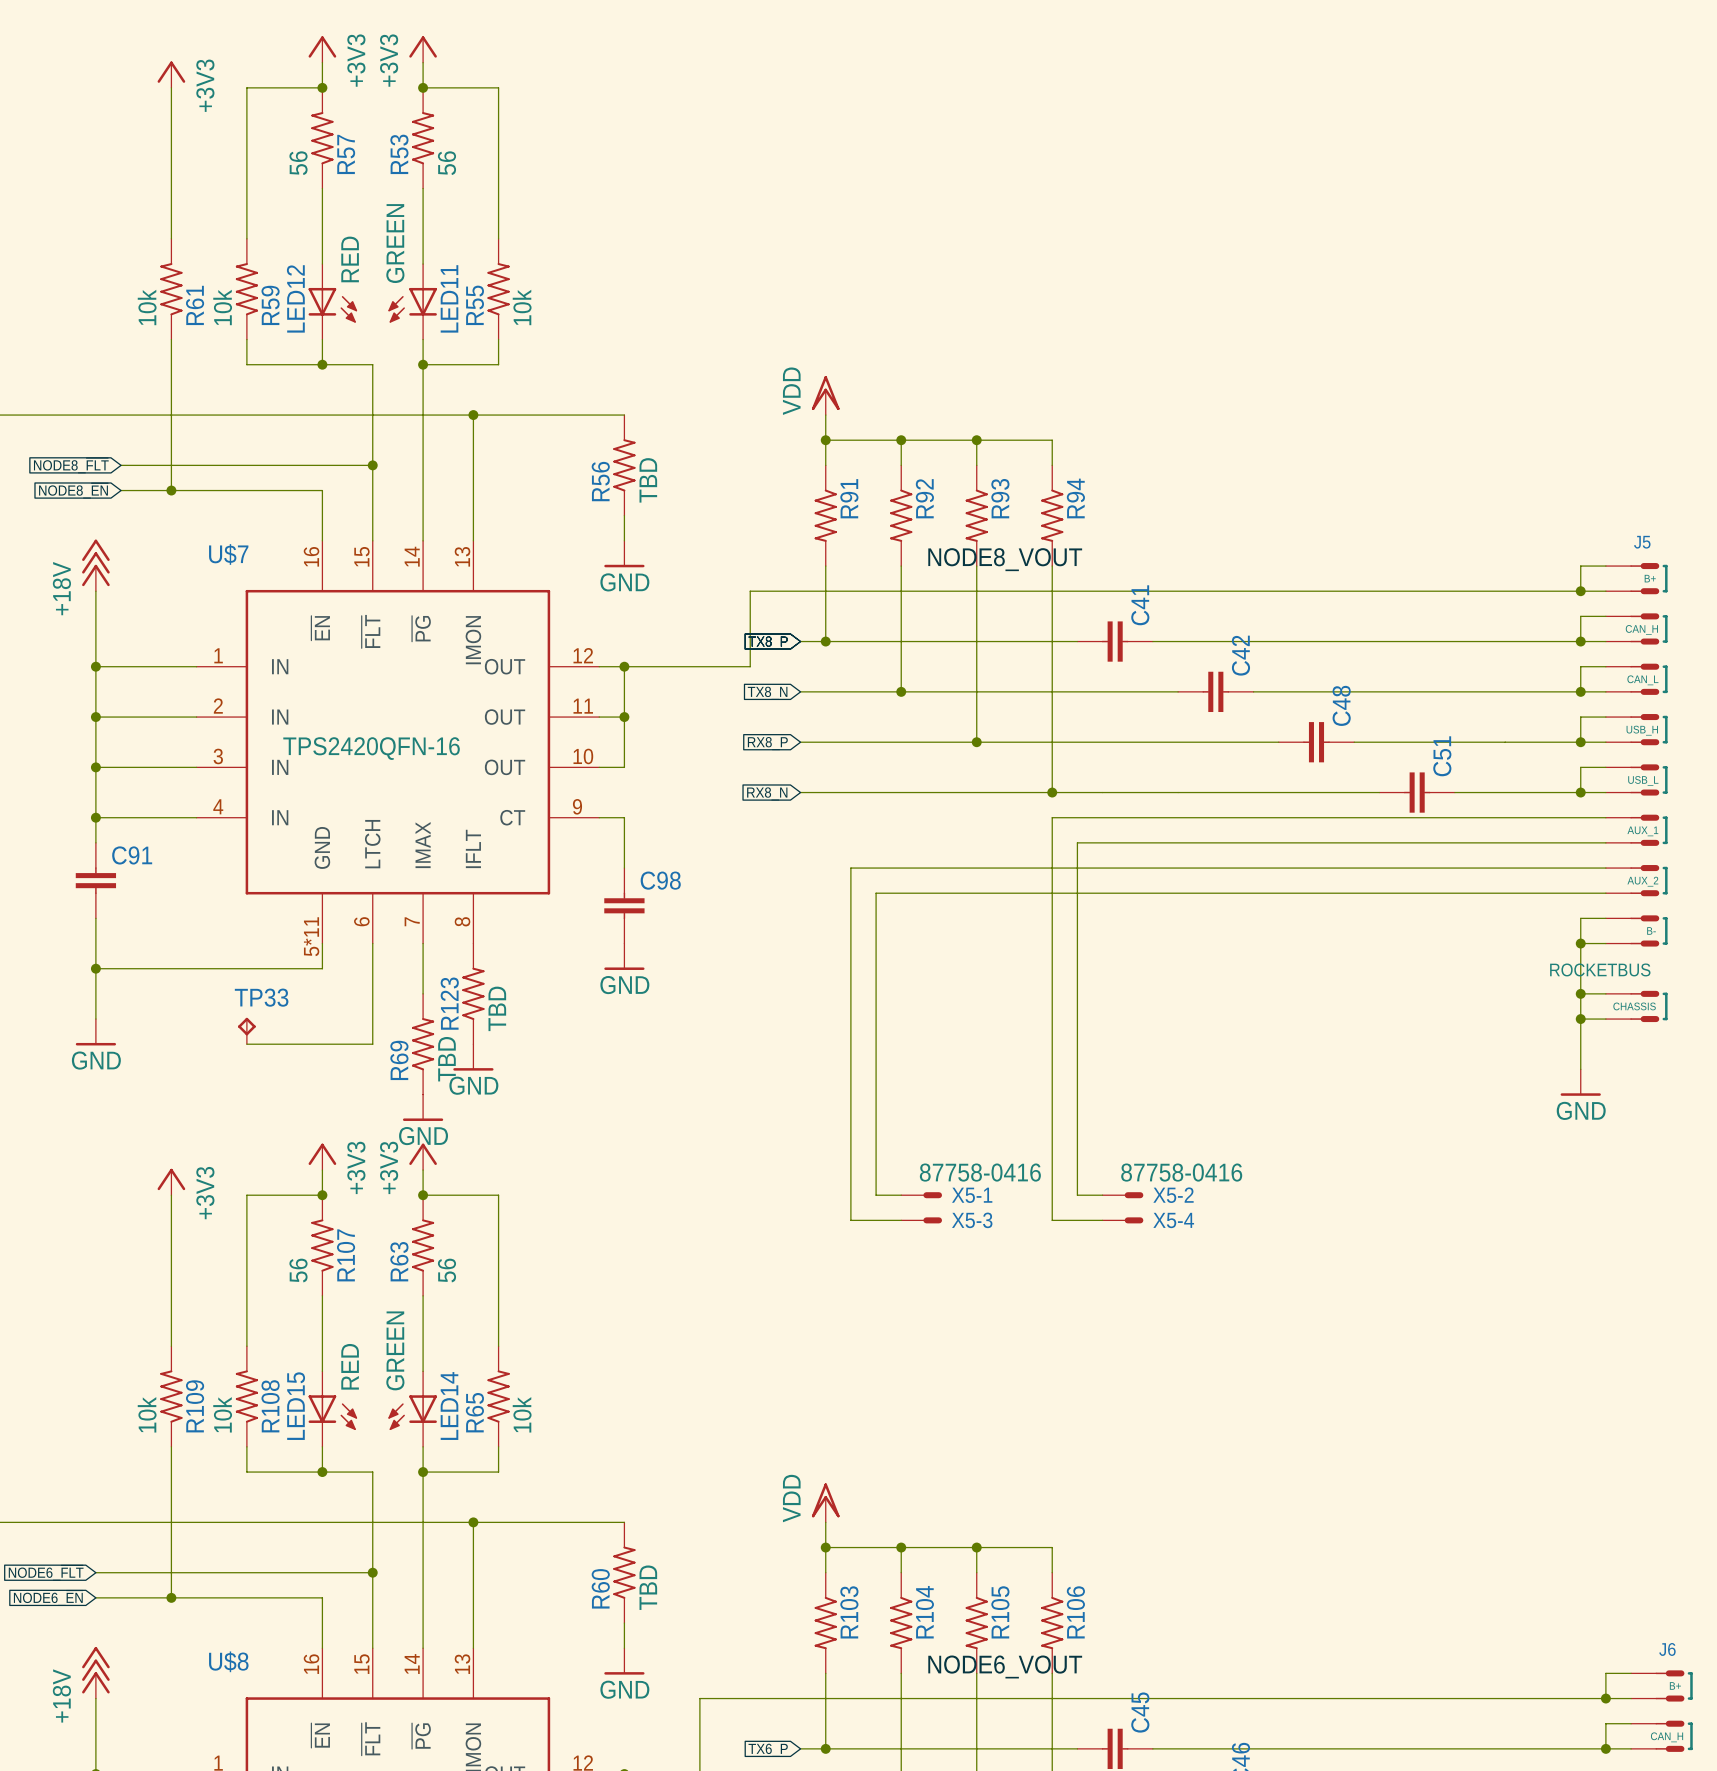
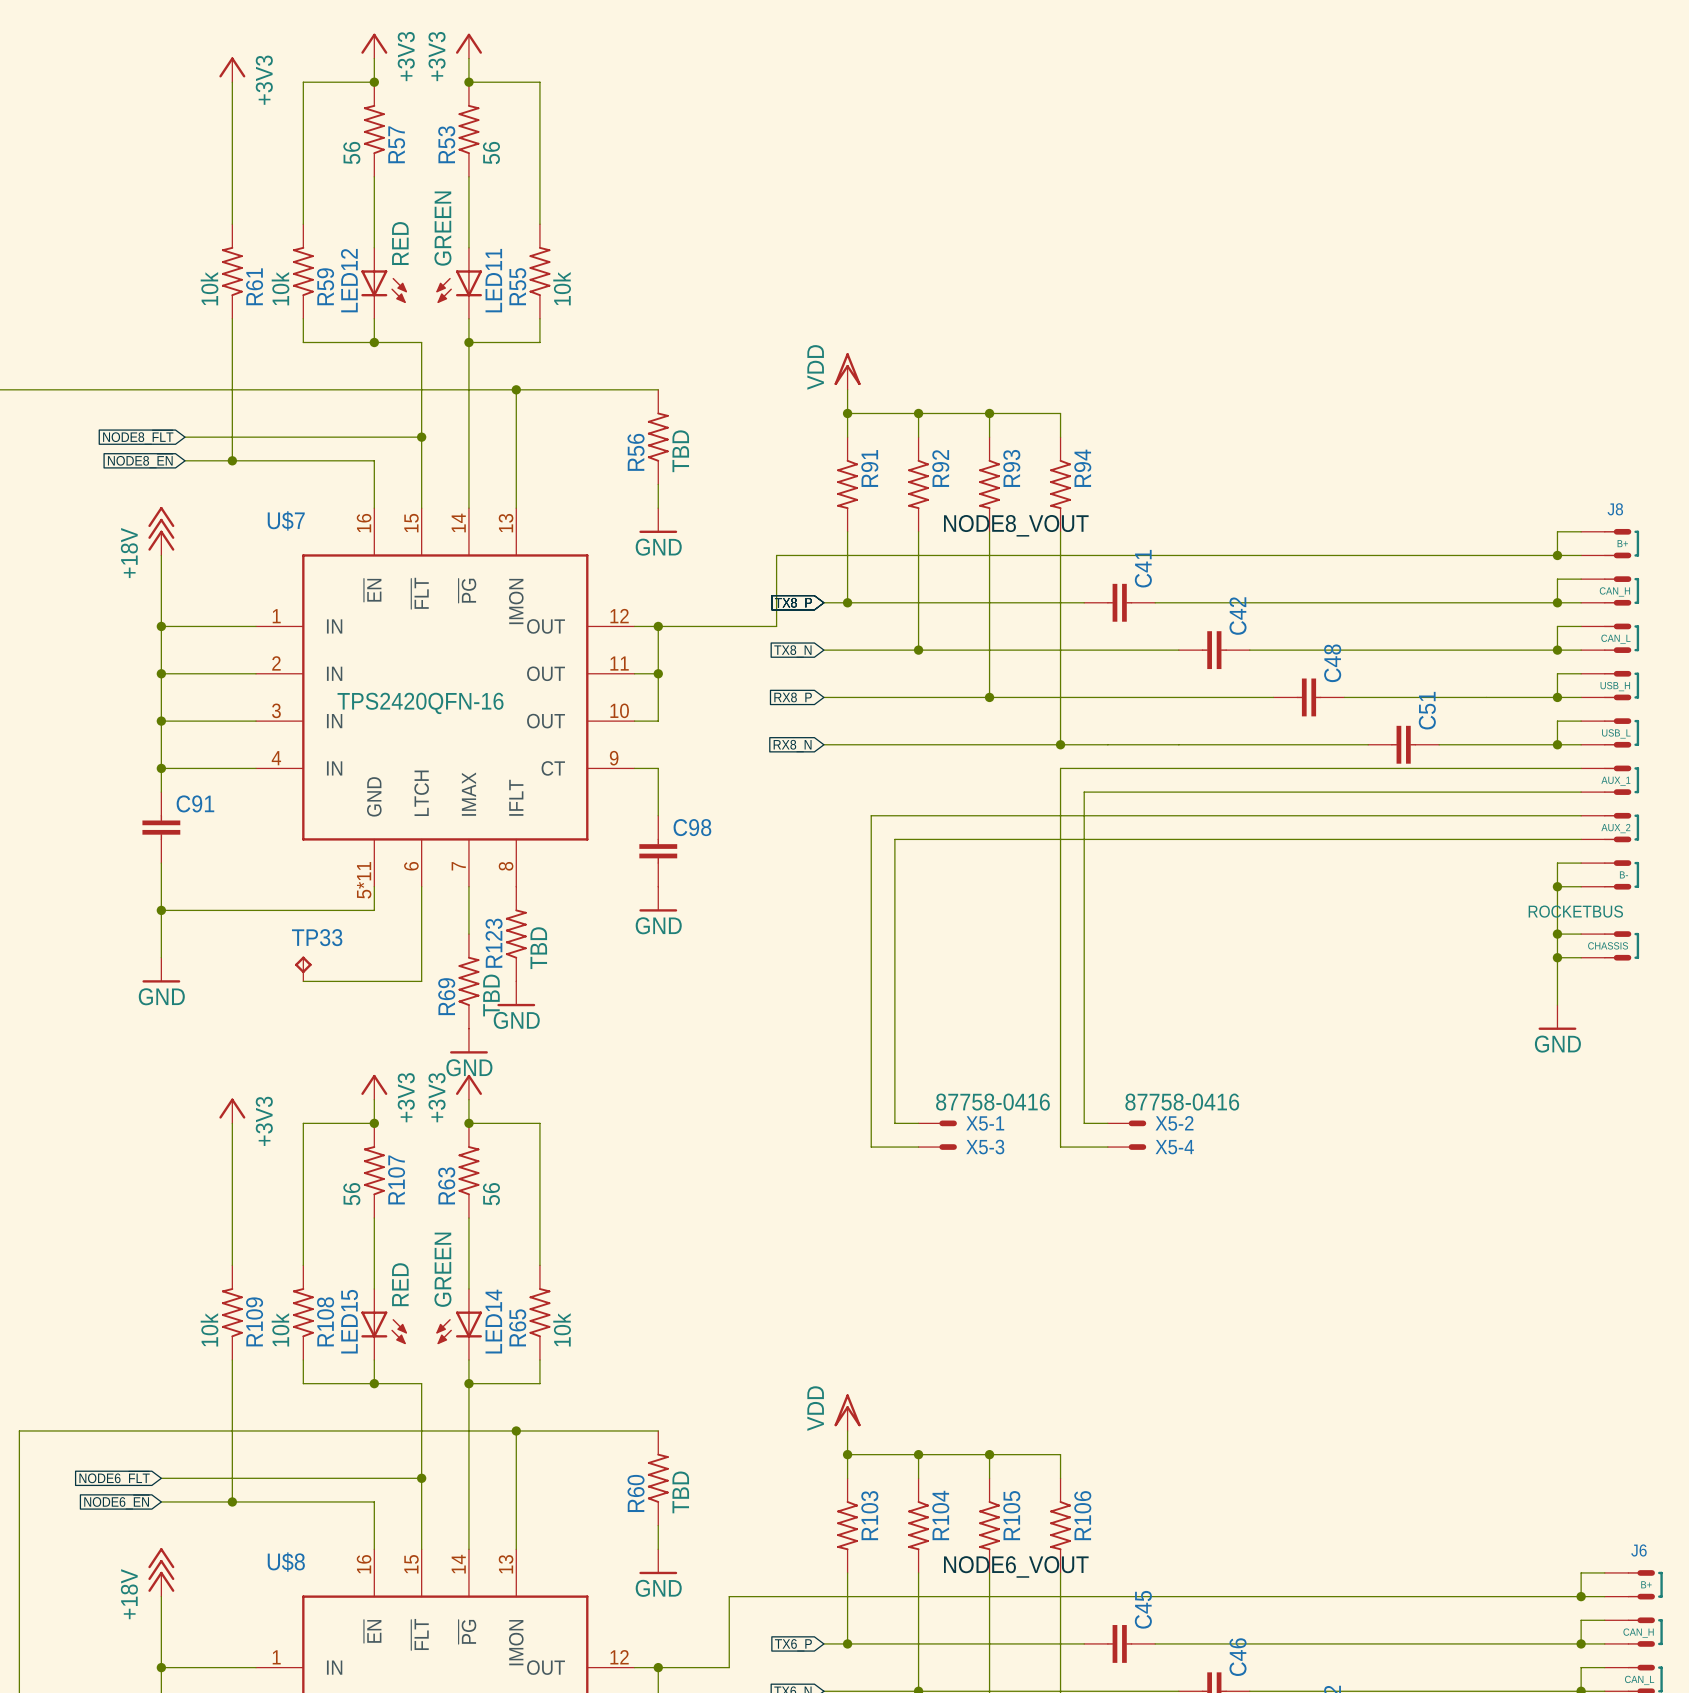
J5 name: J5 (1642, 542) -> J8 (1615, 509)

